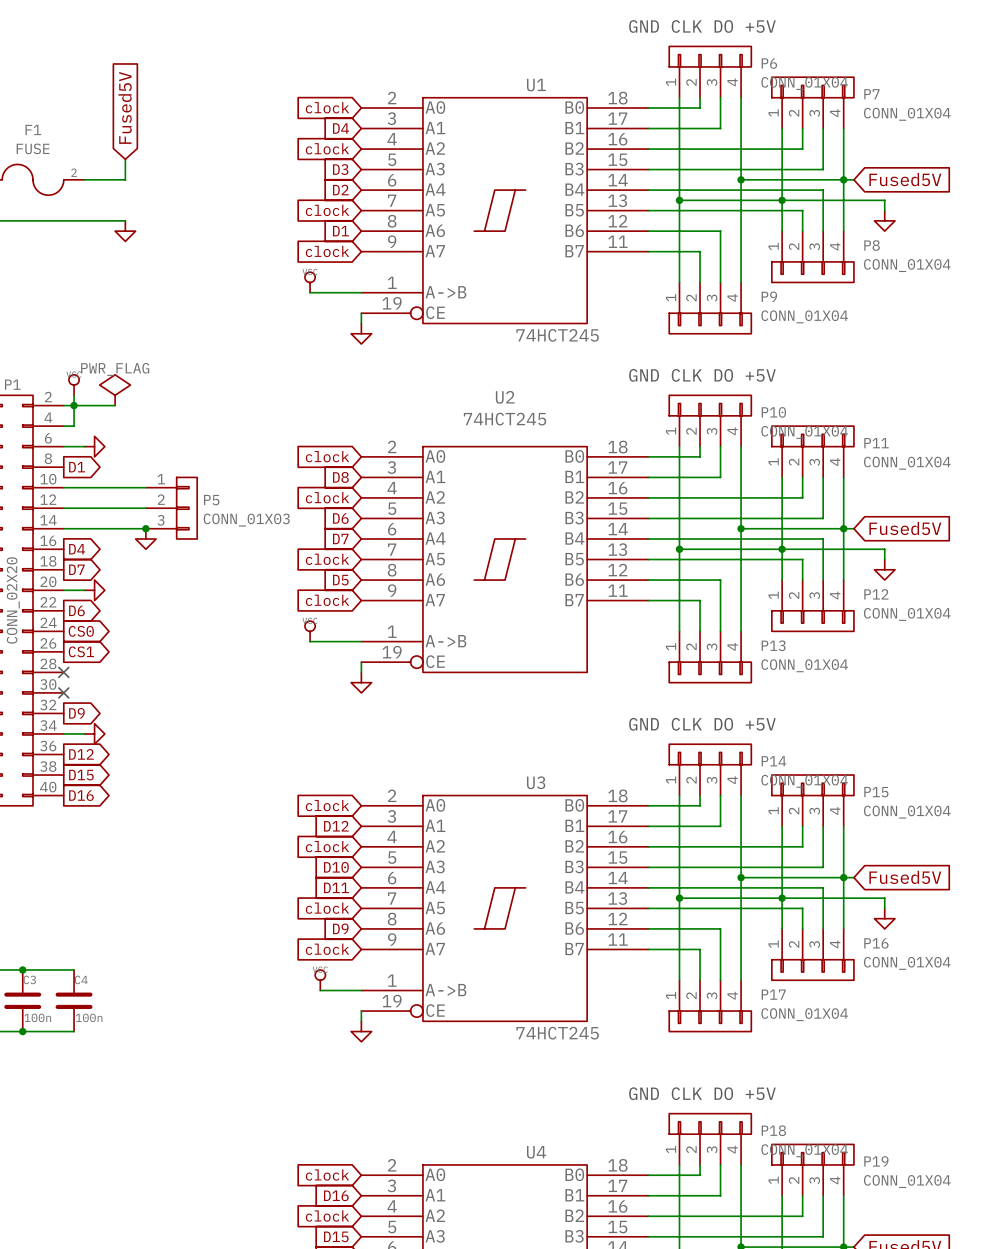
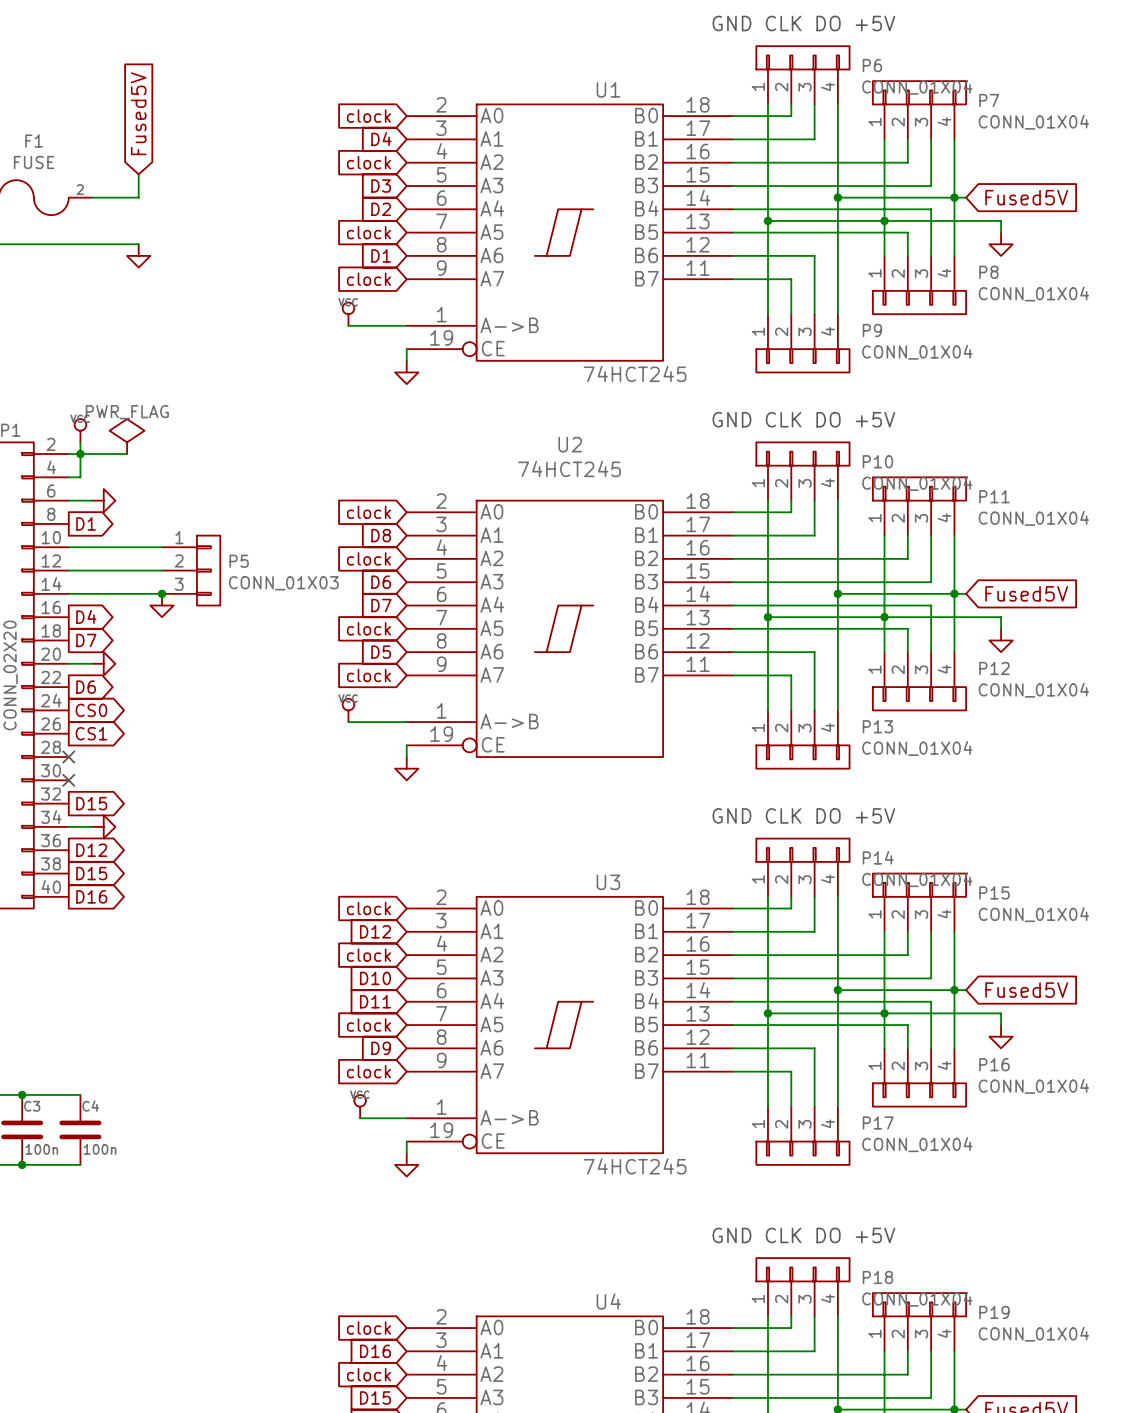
global label: D9 (76, 713) -> D15 (91, 803)

